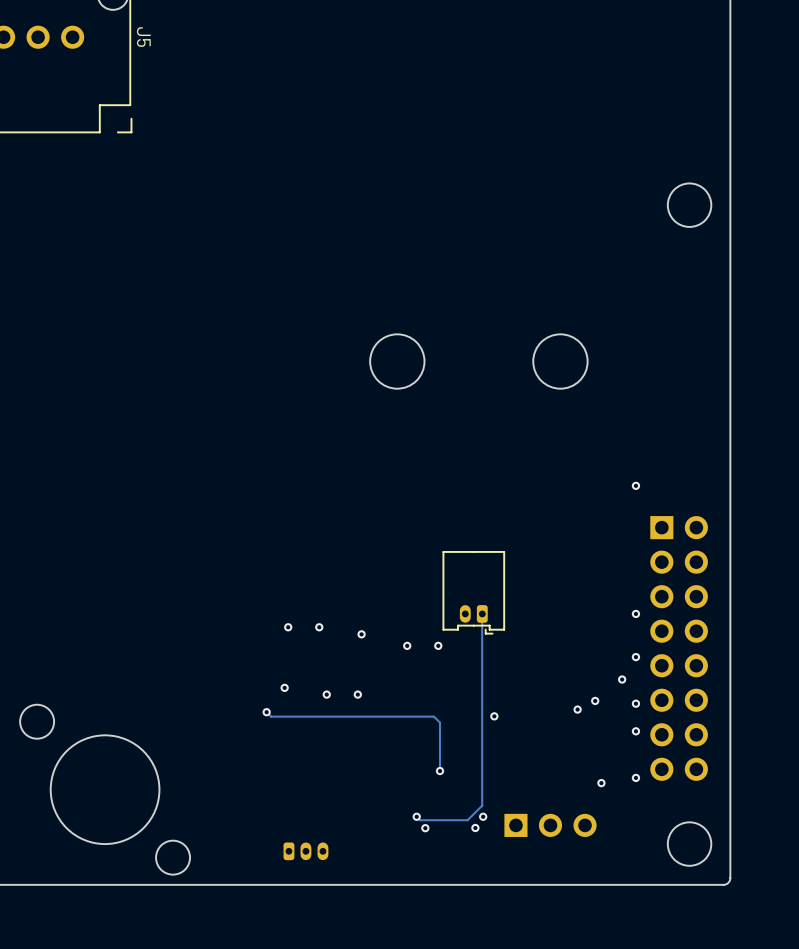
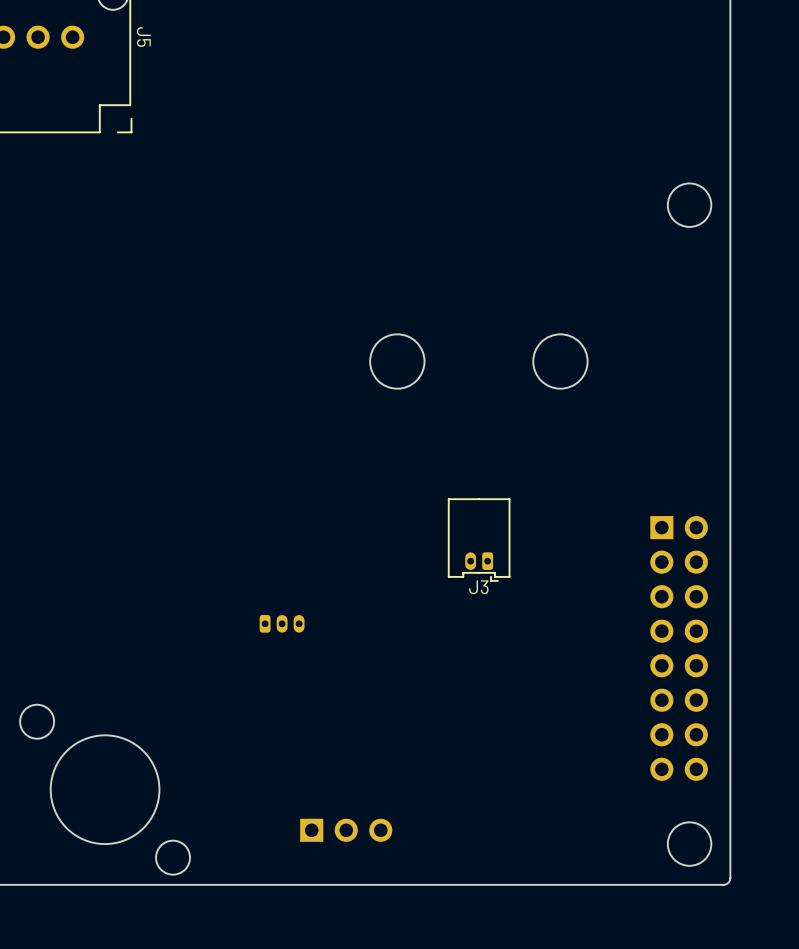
via: (635, 485) -> none
J3: none -> (479, 540)
part: (473, 592) -> none
via: (635, 613) -> none
track: (482, 614) (482, 805) (467, 820) (420, 820) (416, 816) -> none
via: (288, 627) -> none
via: (319, 627) -> none
via: (361, 634) -> none
via: (407, 645) -> none
via: (438, 645) -> none
via: (635, 657) -> none
via: (622, 679) -> none
via: (284, 687) -> none
via: (326, 694) -> none
via: (357, 694) -> none
via: (595, 700) -> none
via: (635, 703) -> none
via: (577, 709) -> none
track: (266, 712) (271, 716) (433, 716) (440, 722) (440, 771) -> none
via: (266, 712) -> none
via: (494, 716) -> none
via: (635, 731) -> none
via: (440, 771) -> none
via: (635, 777) -> none
via: (601, 783) -> none
via: (416, 816) -> none
via: (483, 816) -> none
part position: (550, 825) -> (346, 830)
via: (475, 827) -> none
via: (425, 828) -> none
part position: (305, 851) -> (282, 623)

